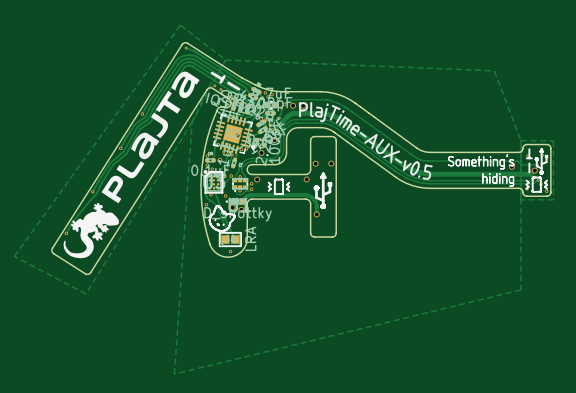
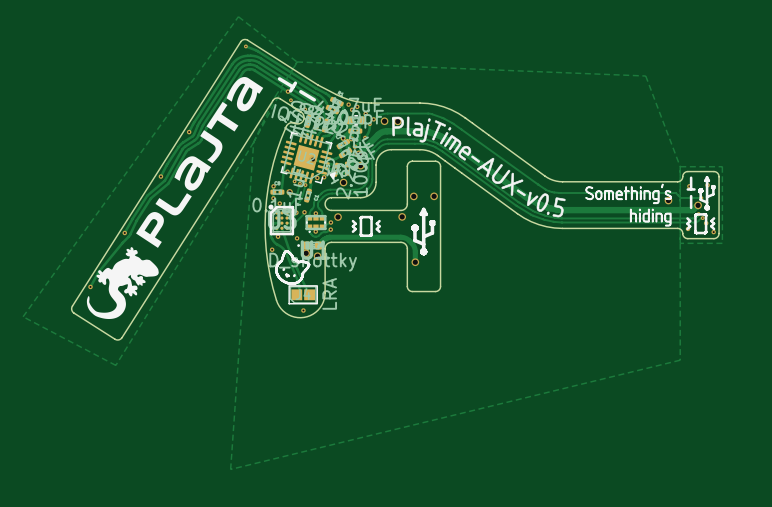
via: none -> (288, 91)
via: (214, 85) -> none

